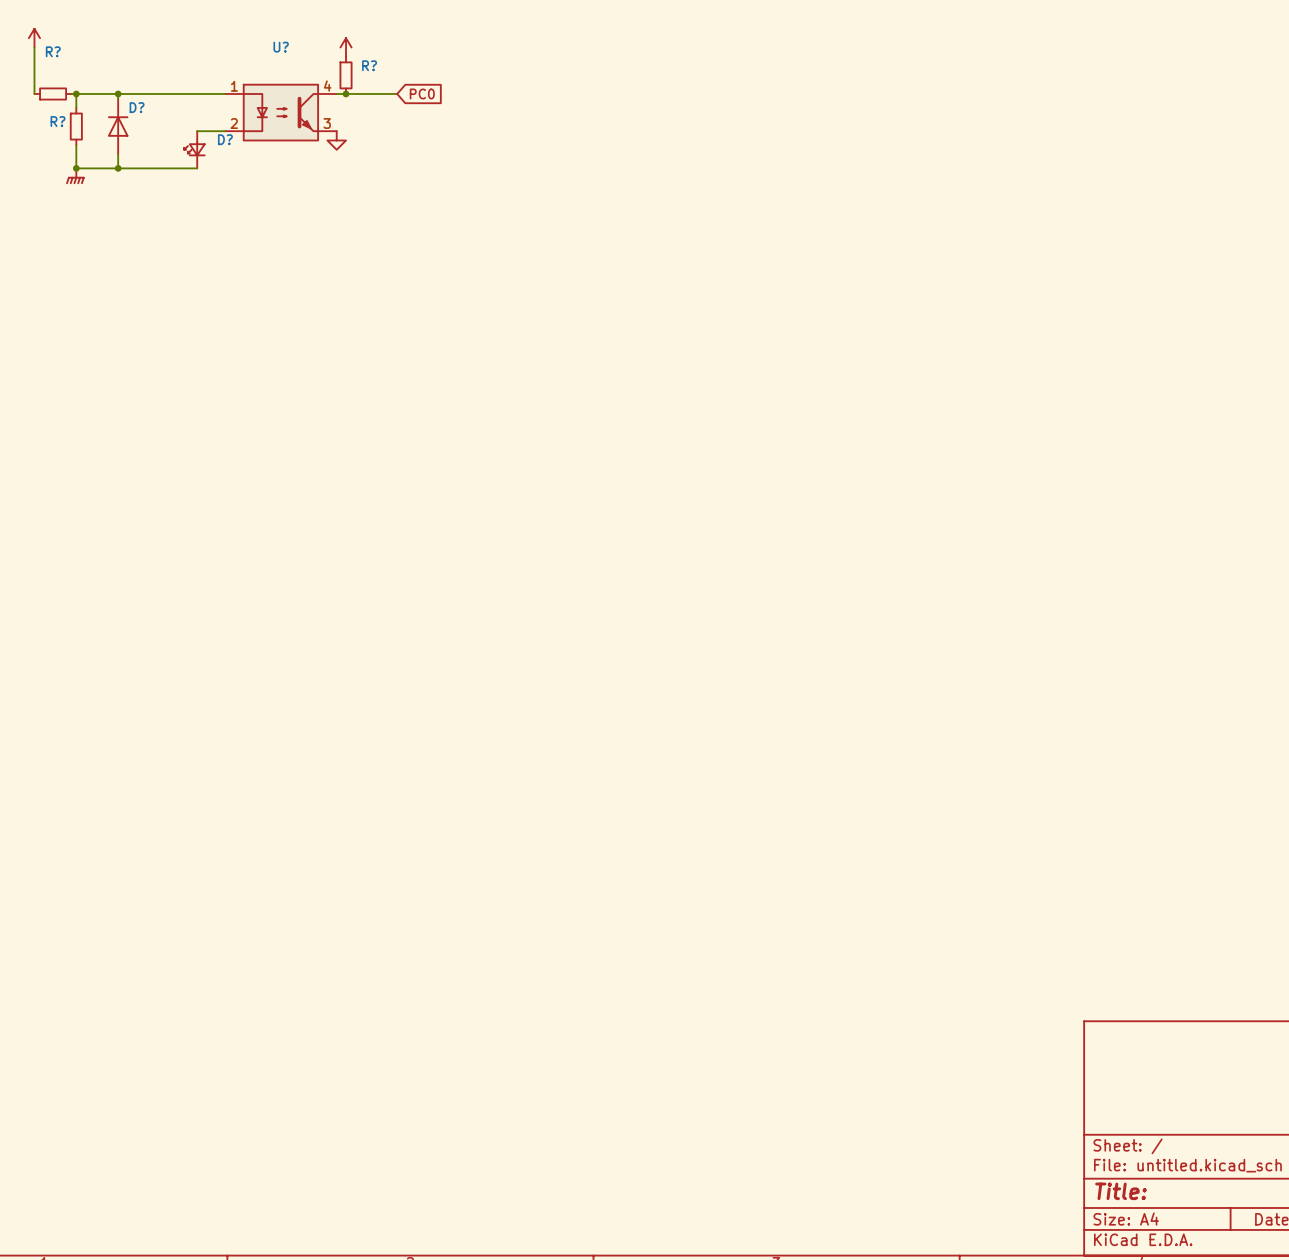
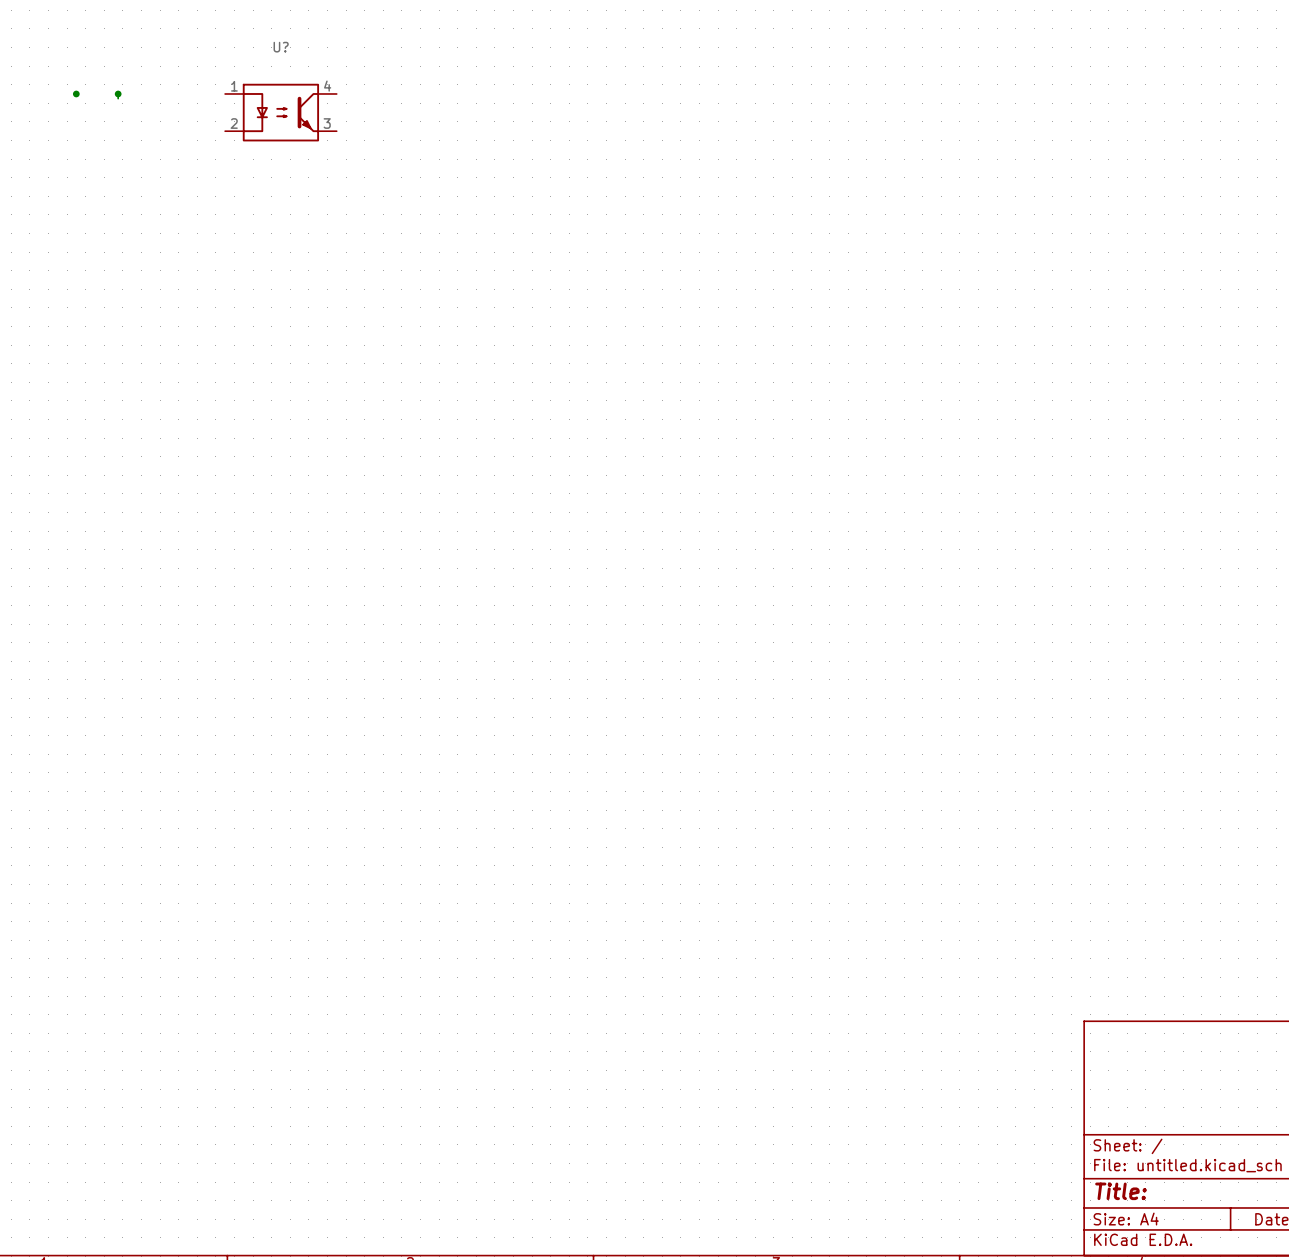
power symbol: (34, 38) -> none
wire: (34, 47) (34, 93) -> none
power symbol: (346, 47) -> none
R?: (346, 75) -> none
R?: (53, 93) -> none
wire: (71, 93) (225, 93) -> none
wire: (76, 93) (76, 107) -> none
wire: (336, 93) (397, 93) -> none
junction: (346, 93) -> none
global label: PC0 (422, 93) -> none
R?: (76, 126) -> none
D?: (118, 126) -> none
wire: (197, 131) (225, 131) -> none
power symbol: (336, 140) -> none
wire: (76, 145) (76, 168) (197, 168) -> none
D?: (194, 149) -> none
wire: (118, 154) (118, 168) -> none
junction: (76, 168) -> none
junction: (118, 168) -> none
power symbol: (75, 176) -> none

